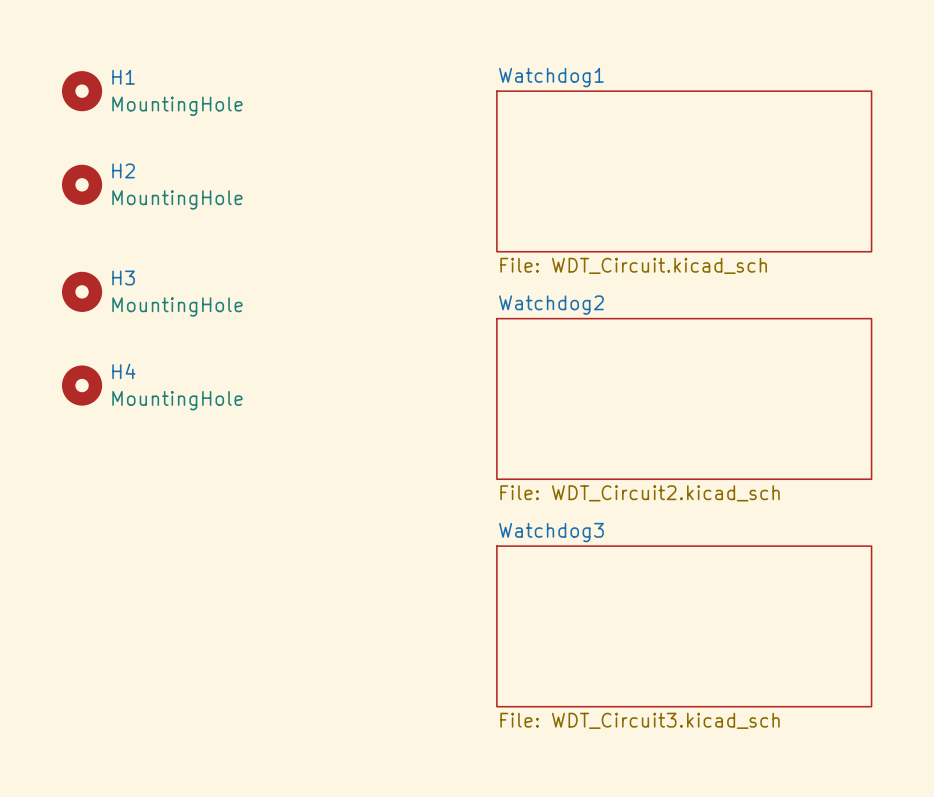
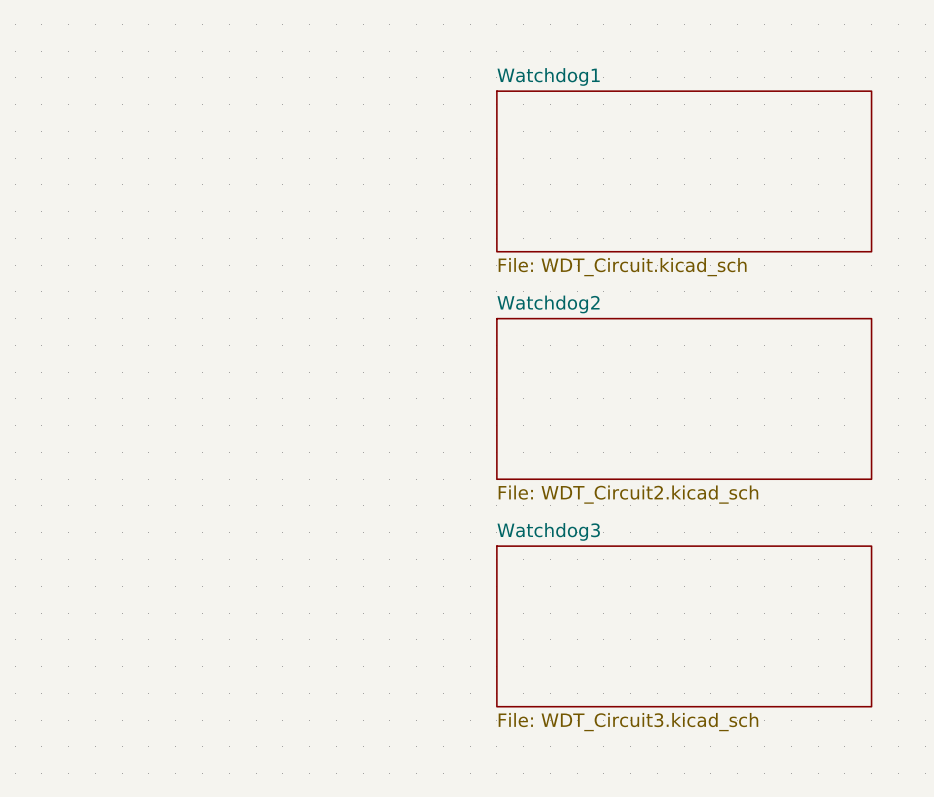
H1: MountingHole (82, 91) -> none
H2: MountingHole (82, 184) -> none
H3: MountingHole (82, 291) -> none
H4: MountingHole (82, 385) -> none

